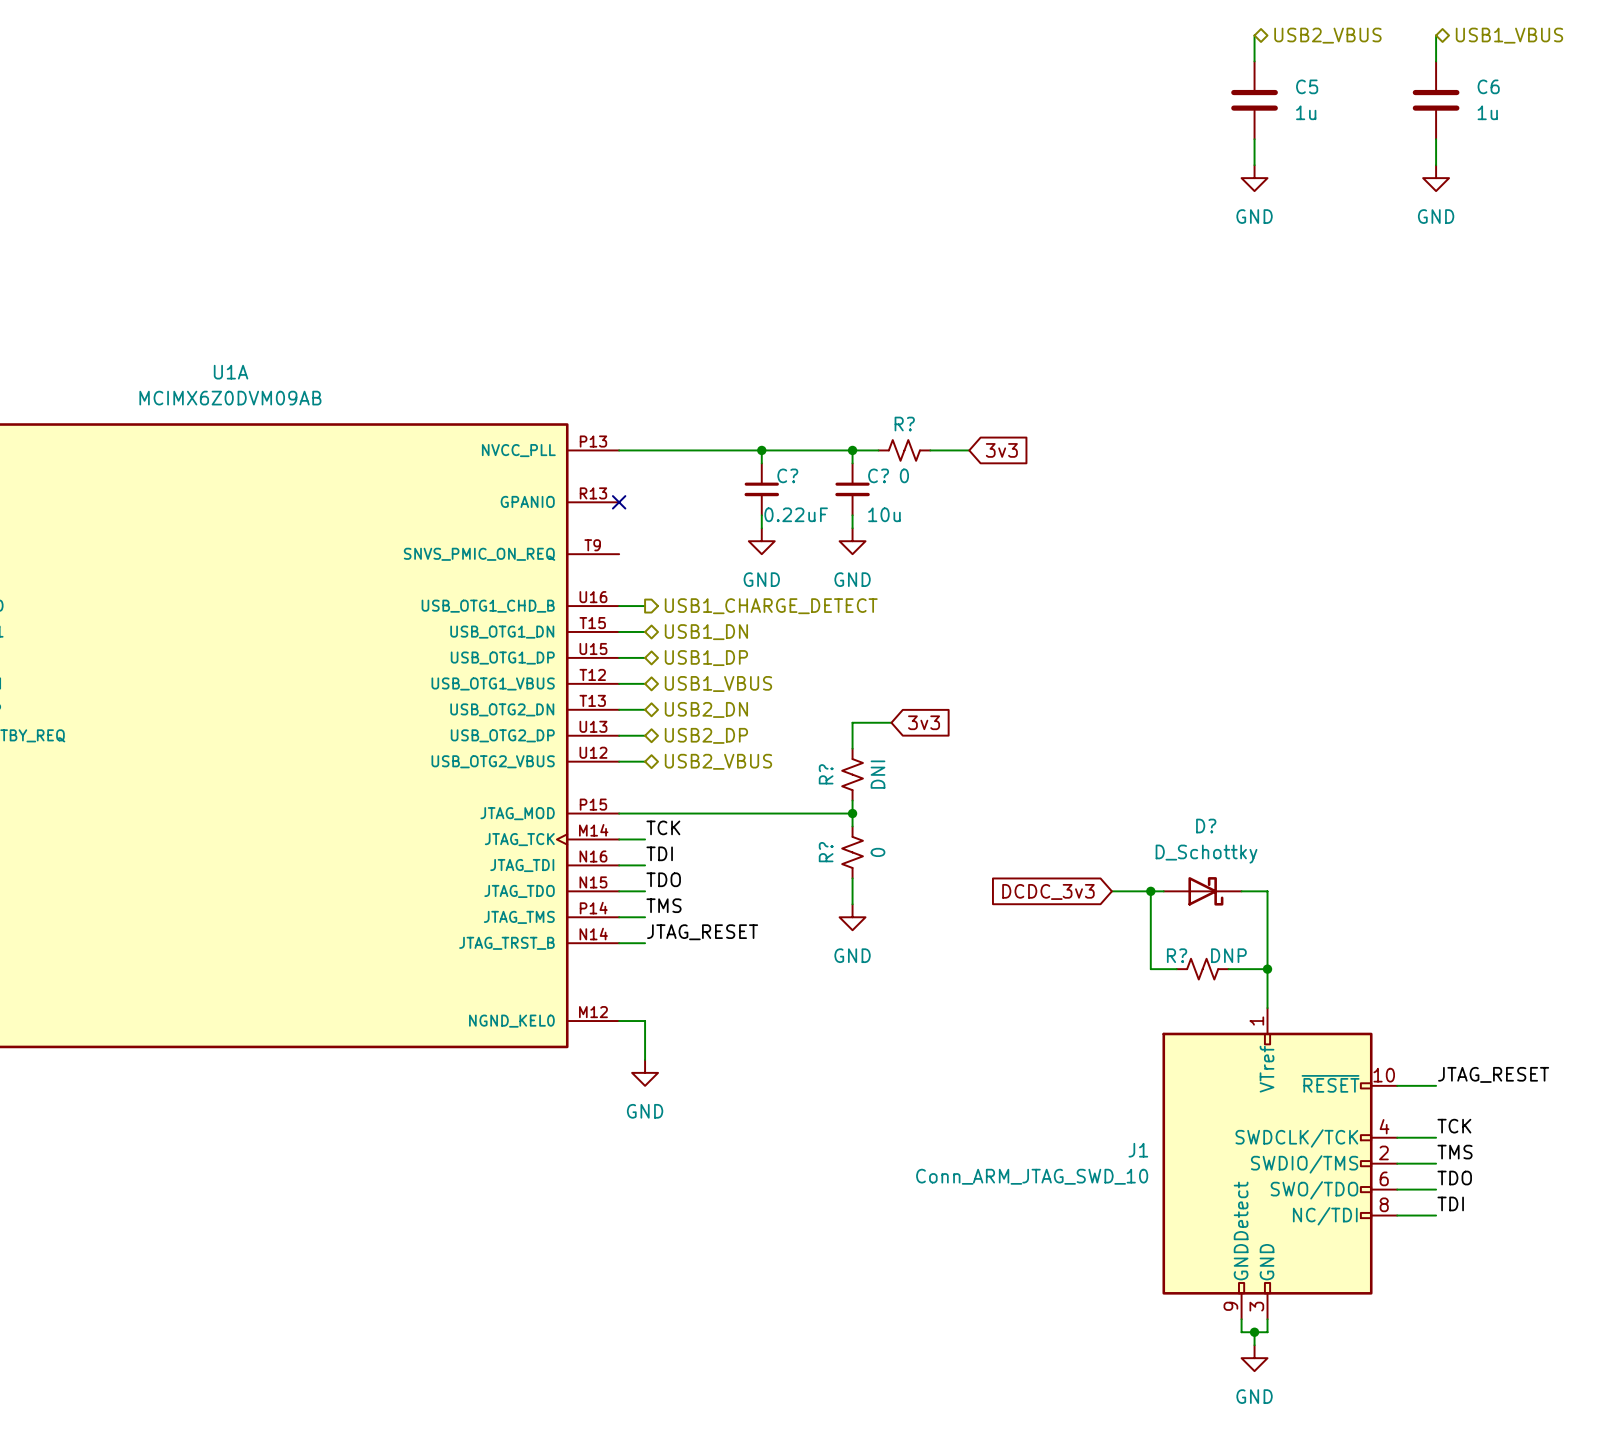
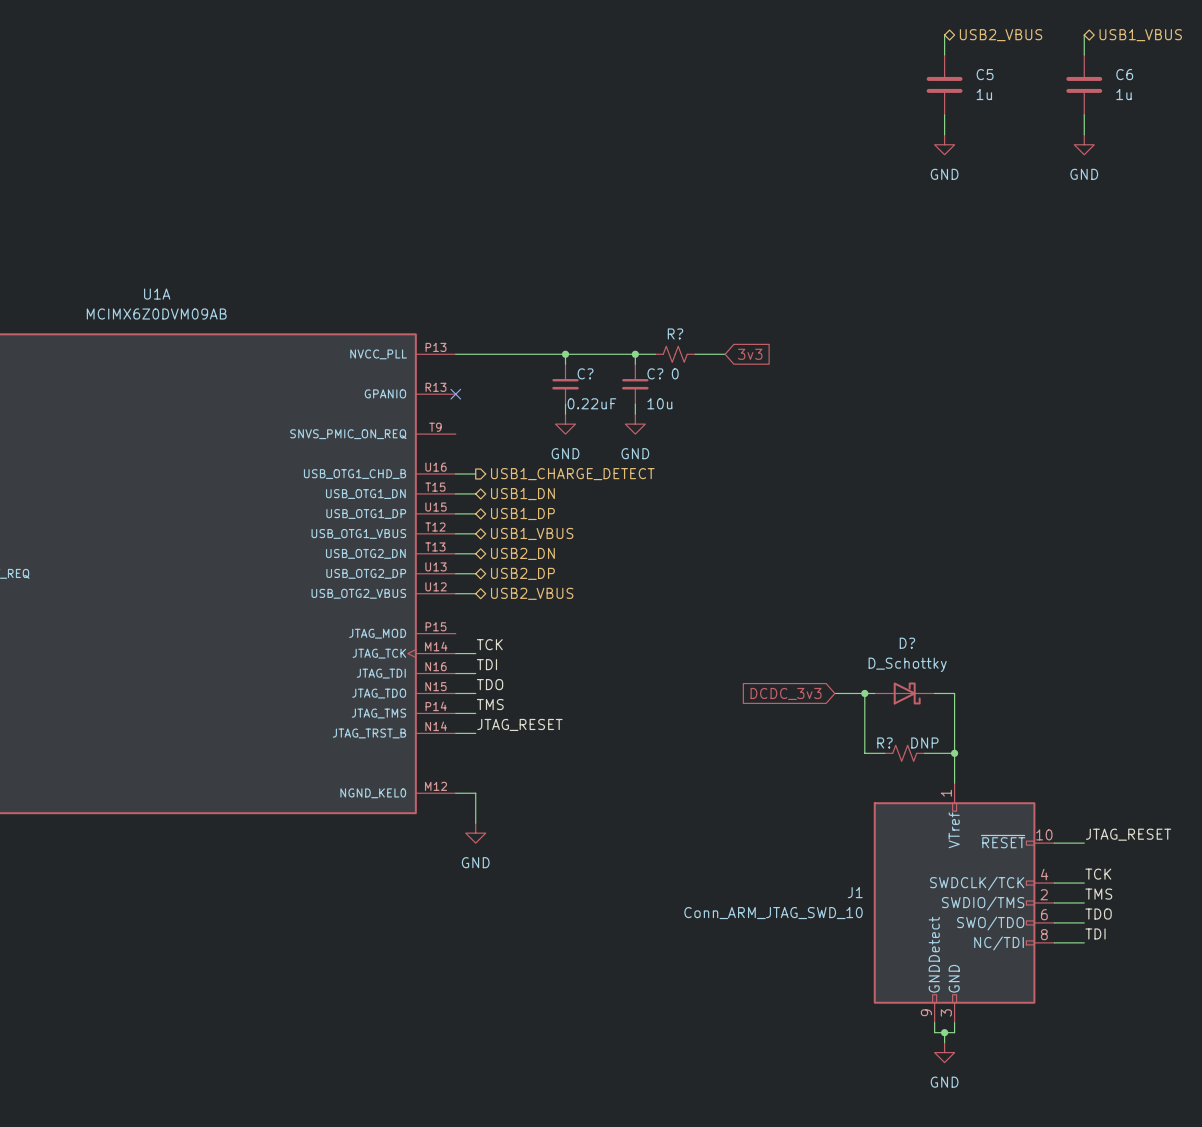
wire: (891, 722) (852, 722) (852, 748) -> none
global label: 3v3 (924, 722) -> none
R?: DNI (852, 774) -> none
wire: (852, 800) (852, 826) -> none
wire: (619, 813) (852, 813) -> none
junction: (852, 813) -> none
R?: 0 (852, 852) -> none
wire: (852, 878) (852, 904) -> none
power symbol: GND (852, 917) -> none

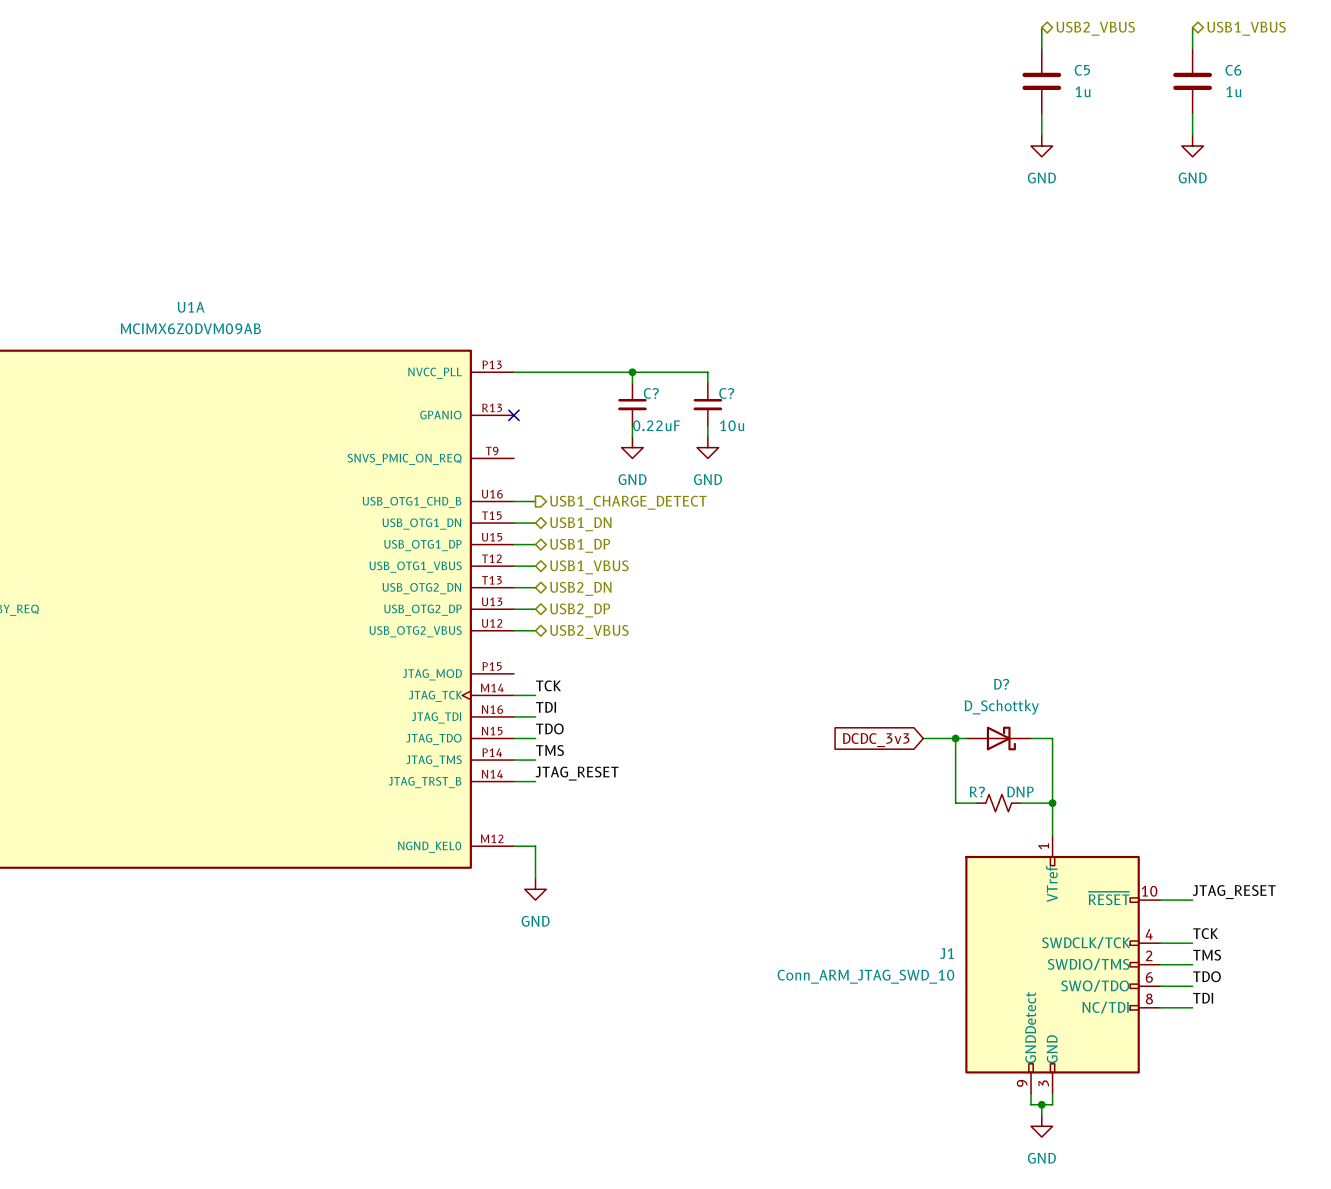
wire: (635, 354) (655, 354) -> none
junction: (635, 354) -> none
R?: 0 (675, 354) -> none
wire: (695, 354) (725, 354) -> none
global label: 3v3 (750, 354) -> none

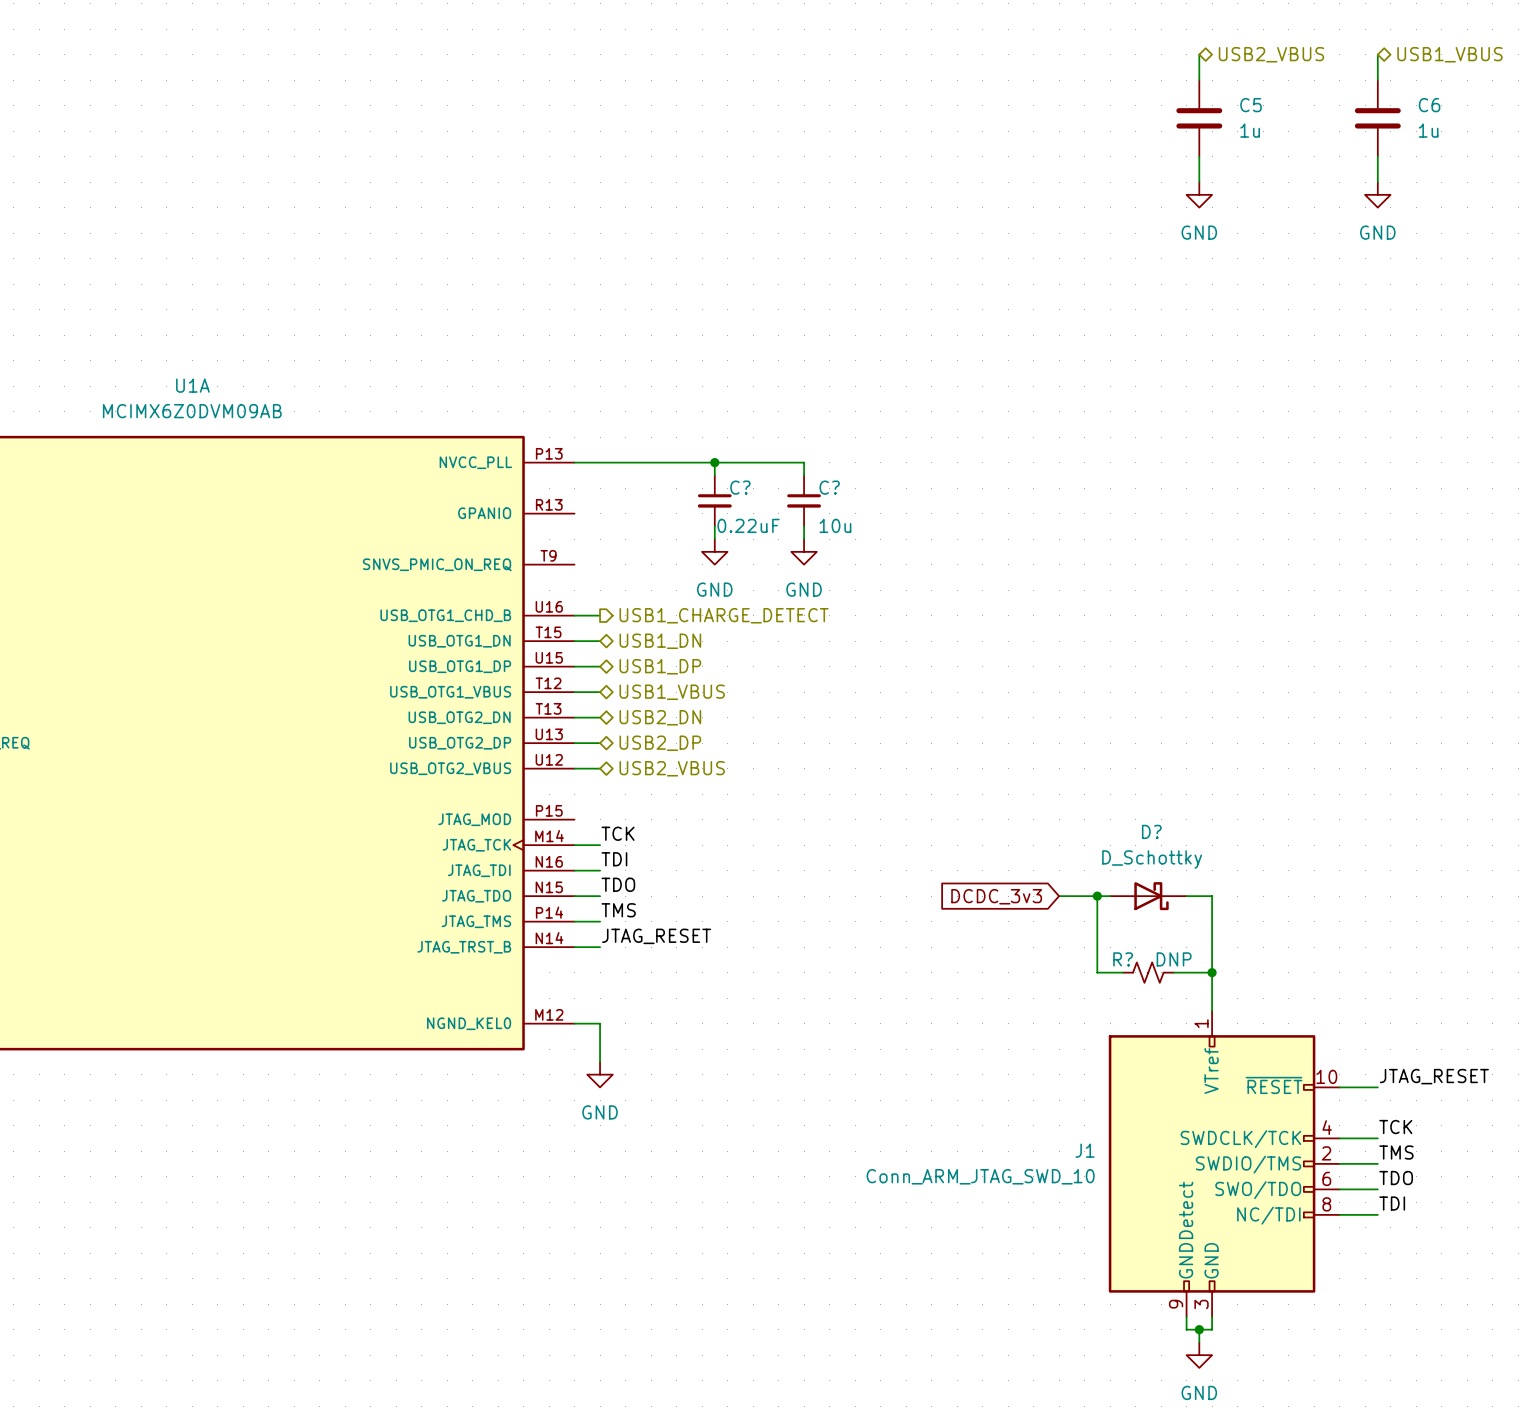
no-connect mark: (513, 415) -> none

